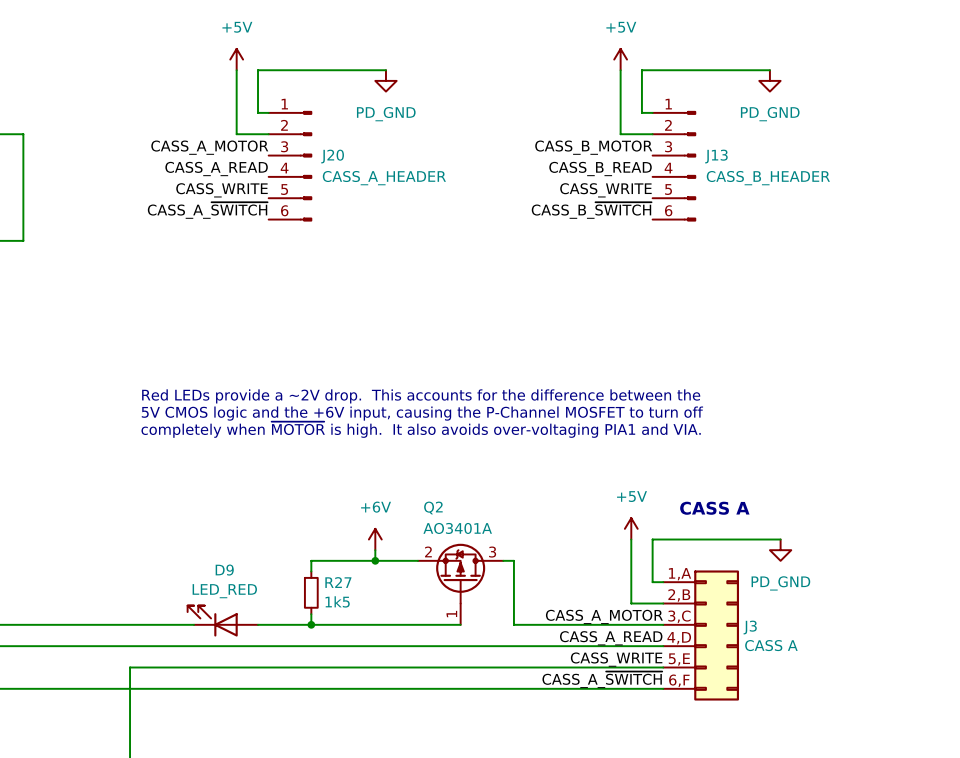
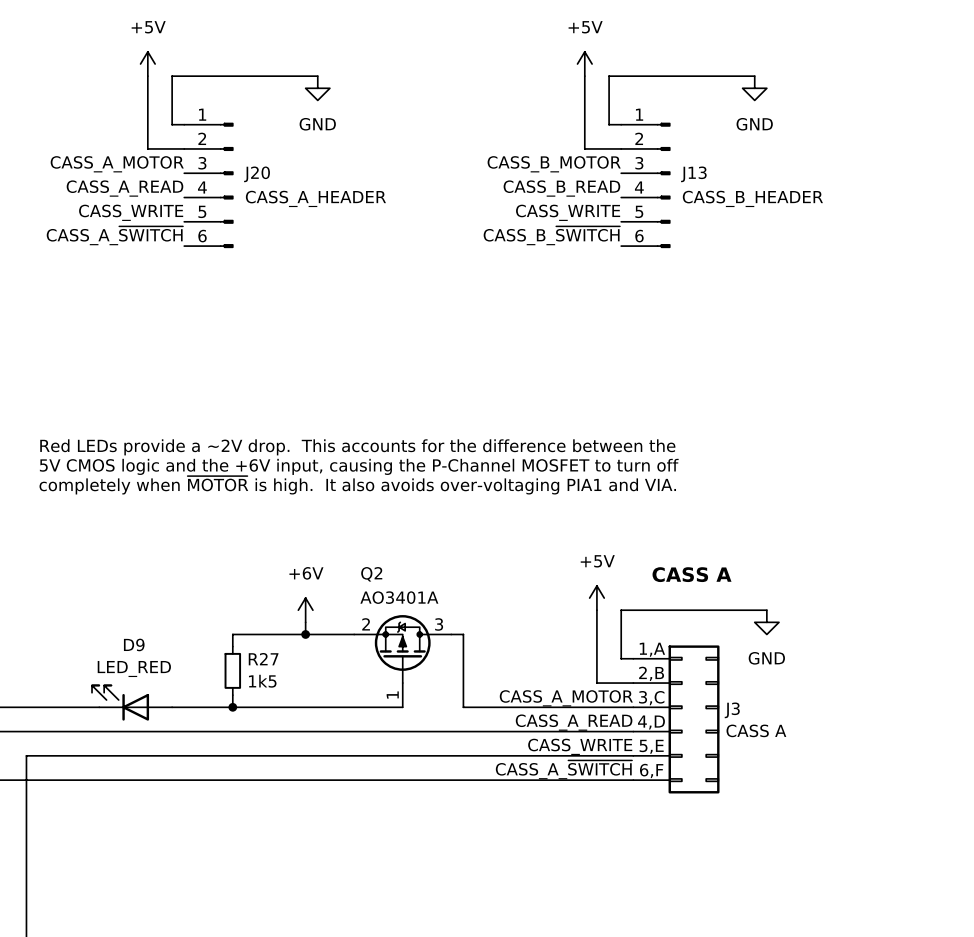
power symbol: PD_GND (385, 80) -> GND (317, 88)
power symbol: PD_GND (769, 80) -> GND (754, 88)
power symbol: PD_GND (780, 550) -> GND (766, 622)

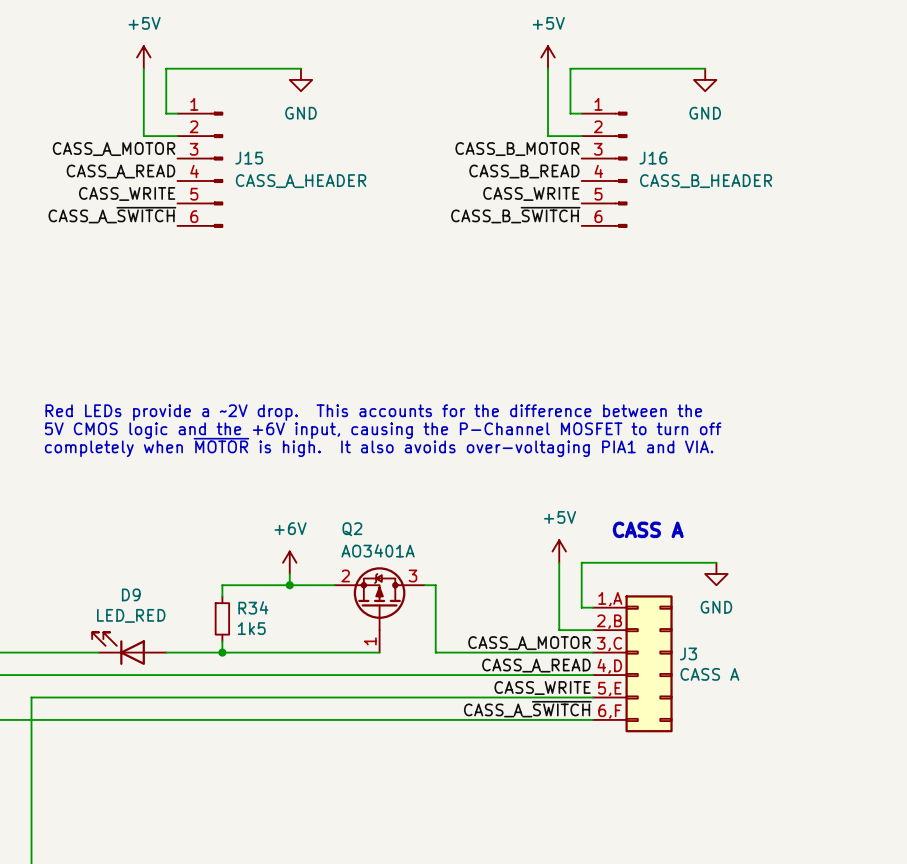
J20 name: J20 (257, 174) -> J15 (249, 158)
J13 name: J13 (693, 174) -> J16 (653, 158)
R27 name: R27 (263, 659) -> R34 (253, 607)

